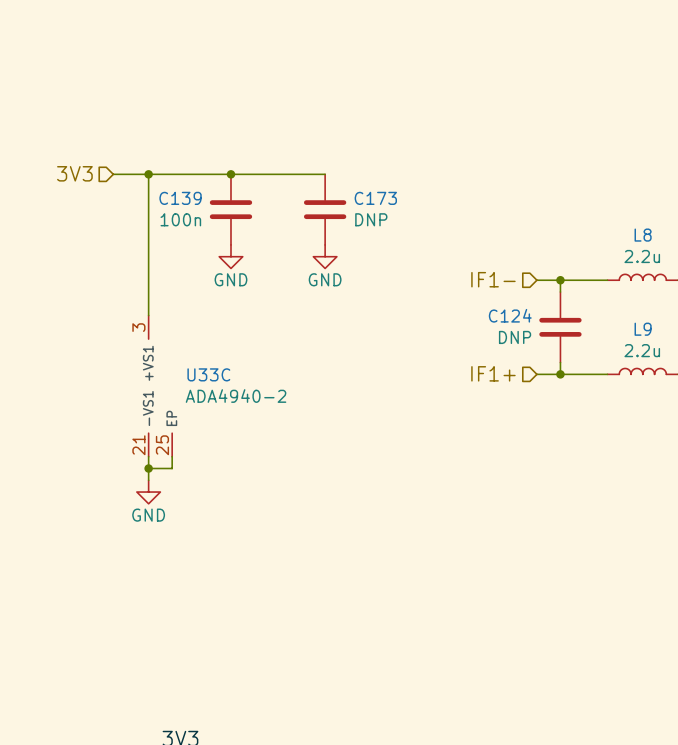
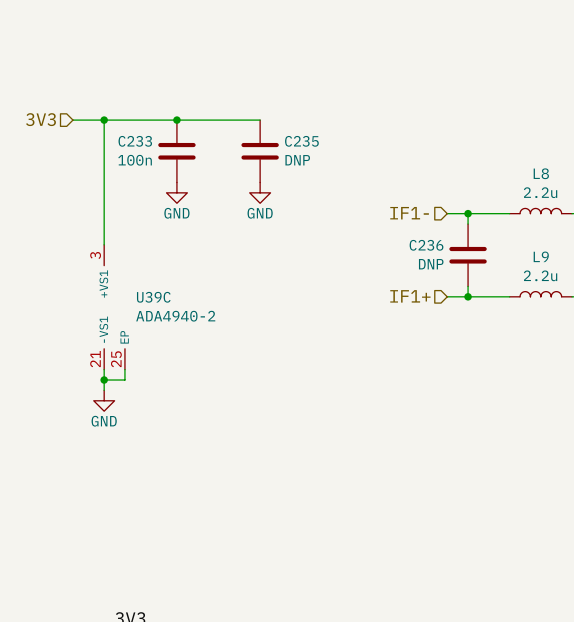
C139 name: C139 (180, 198) -> C233 (135, 141)
C173 name: C173 (375, 198) -> C235 (301, 141)
C124 name: C124 (510, 315) -> C236 (426, 245)
U33C name: U33C (208, 374) -> U39C (153, 297)

